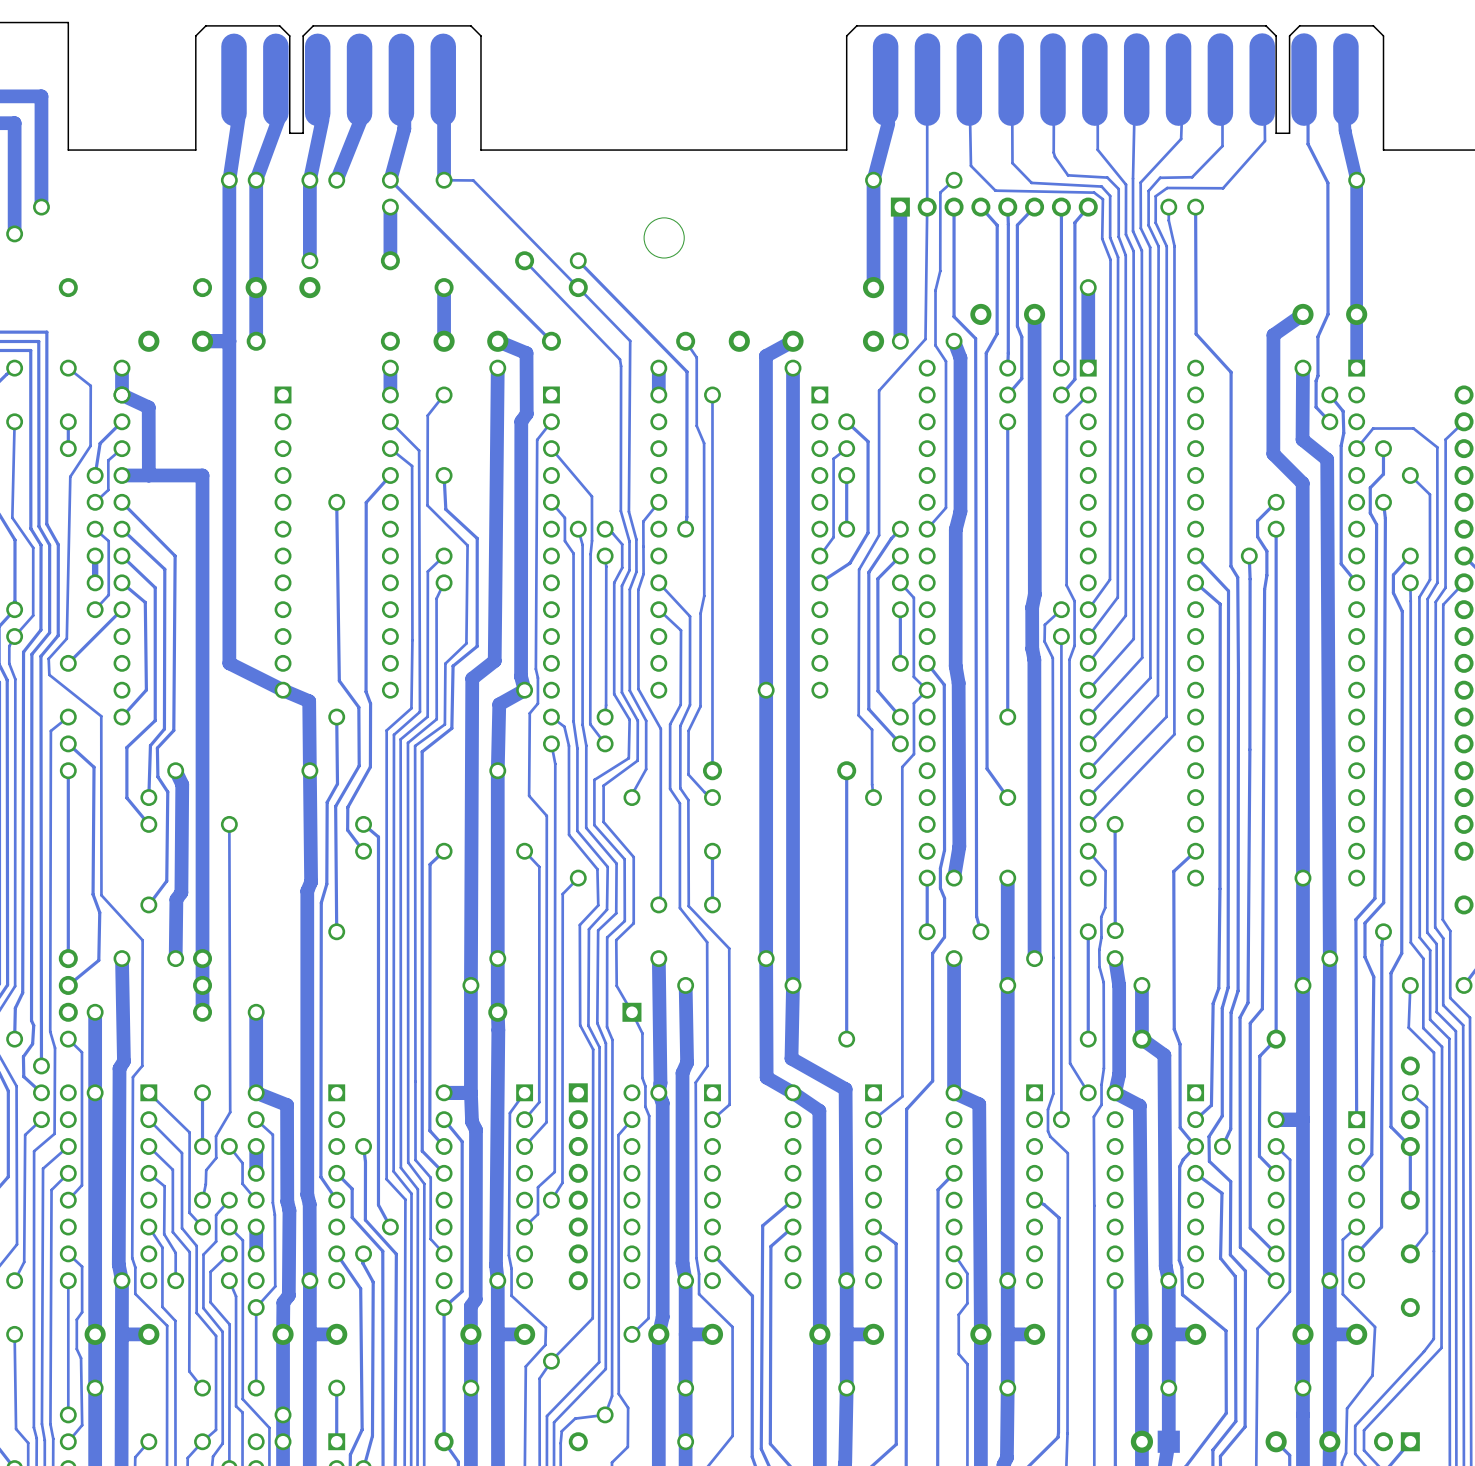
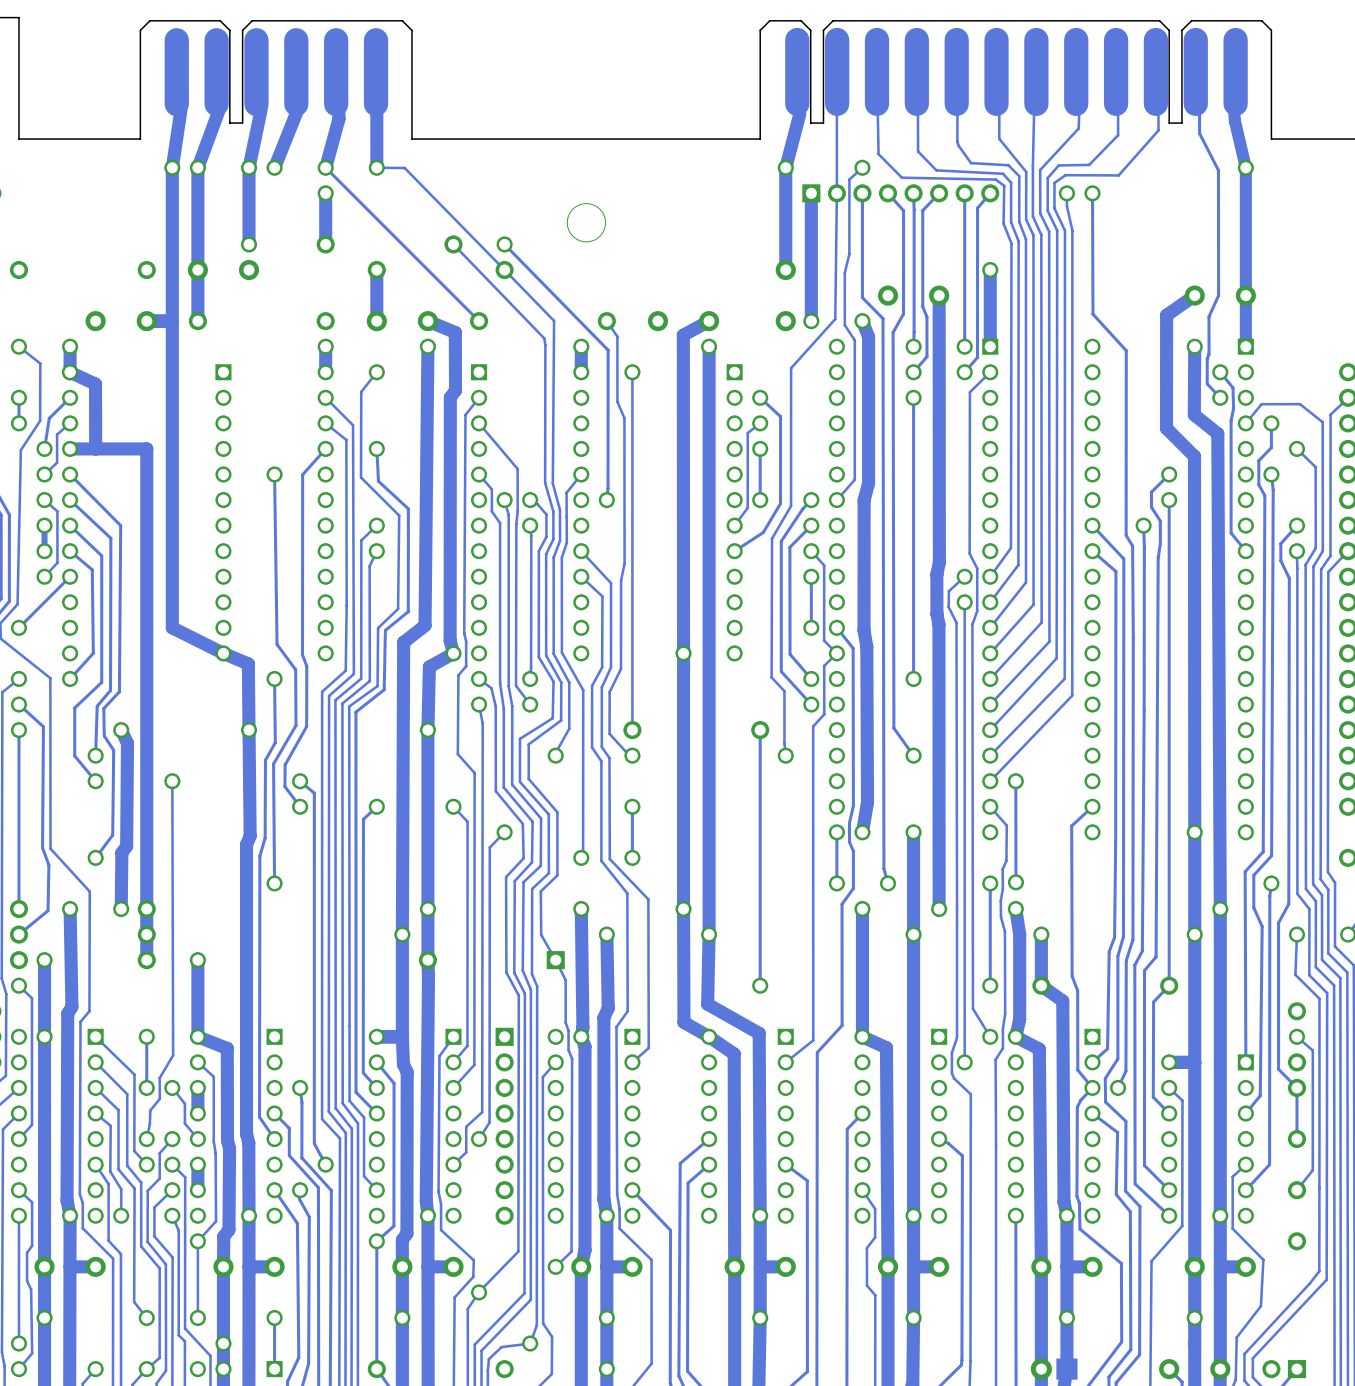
board edge: (923, 25) (889, 25) -> (833, 20) (823, 30) (823, 123) (810, 123) (810, 30) (801, 20)

